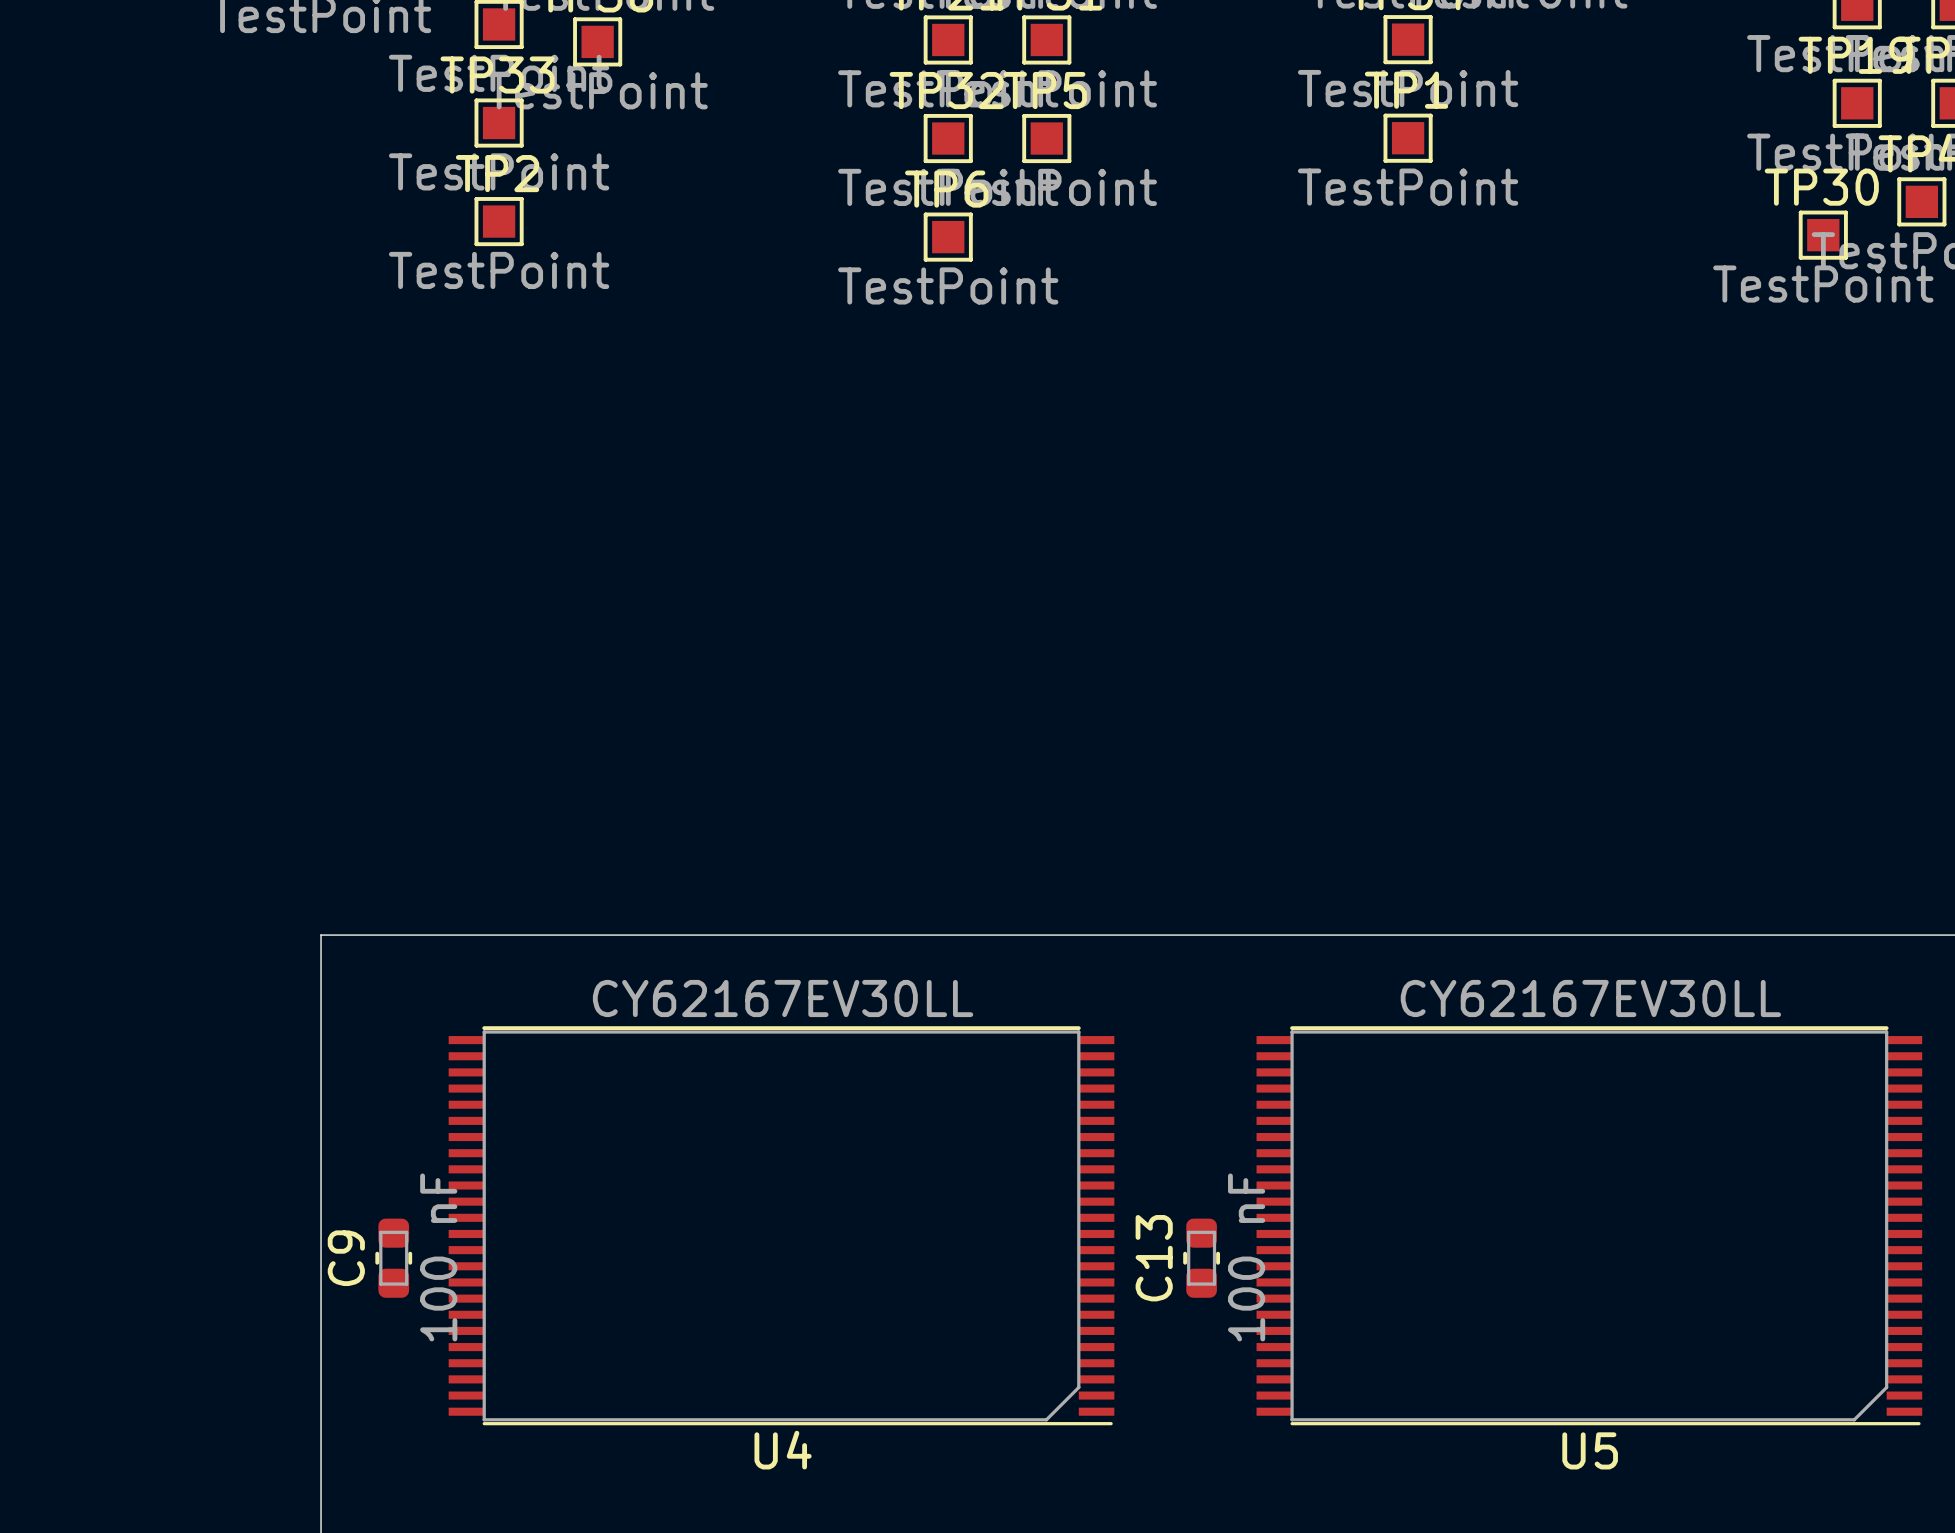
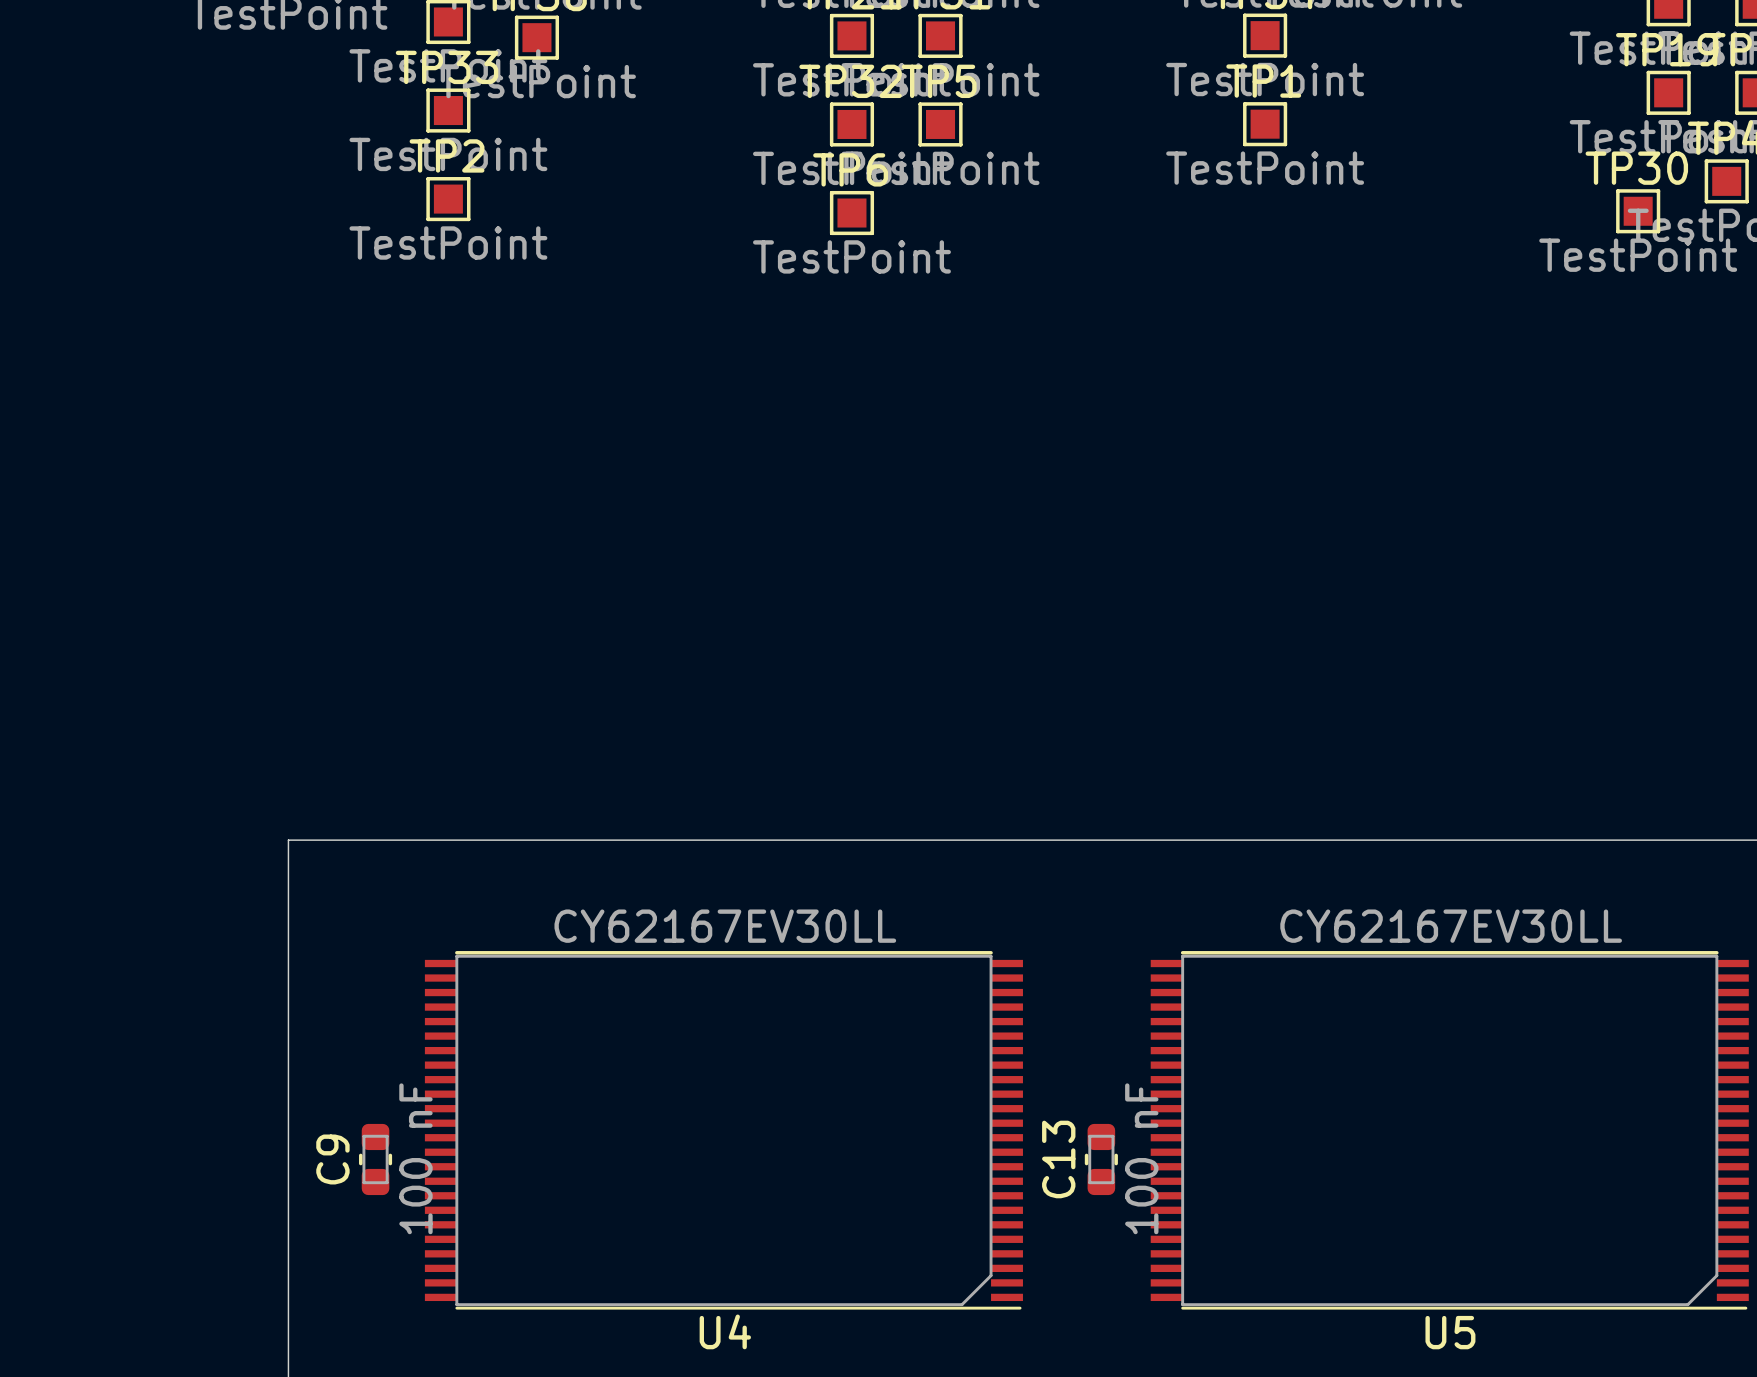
U4 position: (781, 1225) -> (723, 1130)
U5 position: (1589, 1225) -> (1449, 1130)
C9 position: (393, 1258) -> (375, 1159)
C13 position: (1201, 1258) -> (1101, 1159)

